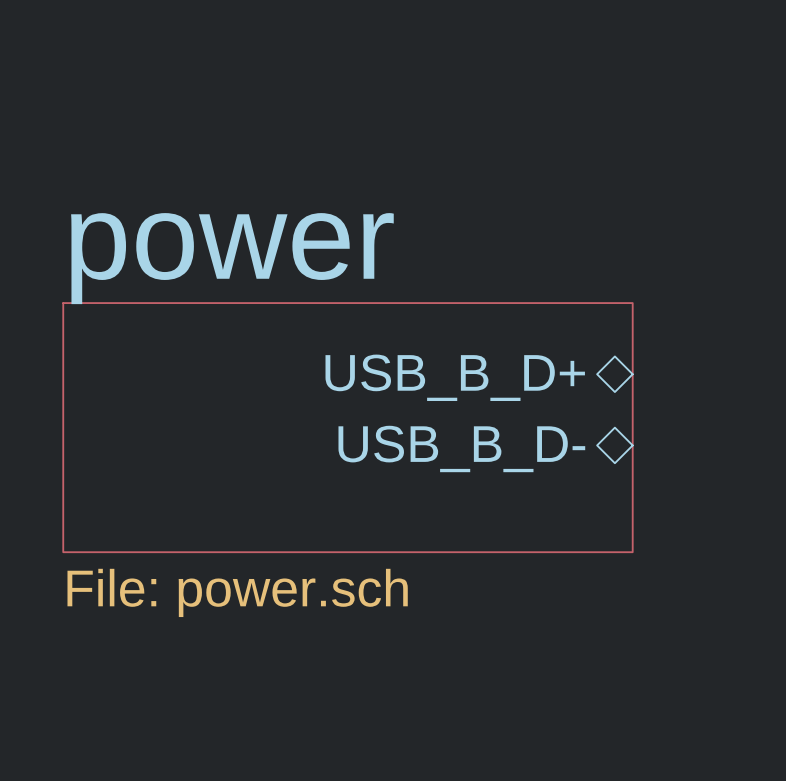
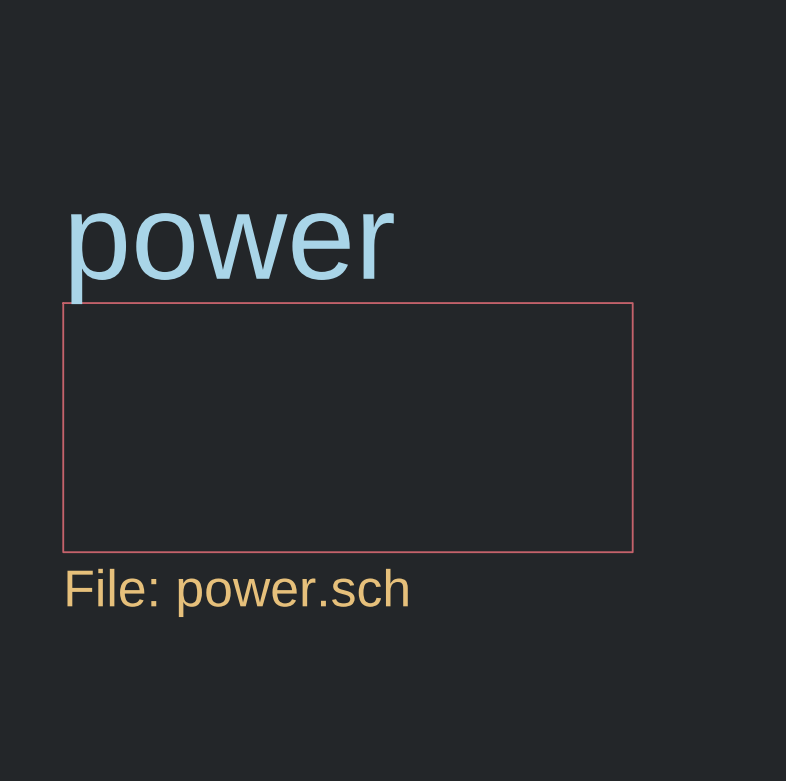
sheet pin: USB_B_D+ (455, 377) -> none
sheet pin: USB_B_D- (461, 448) -> none

